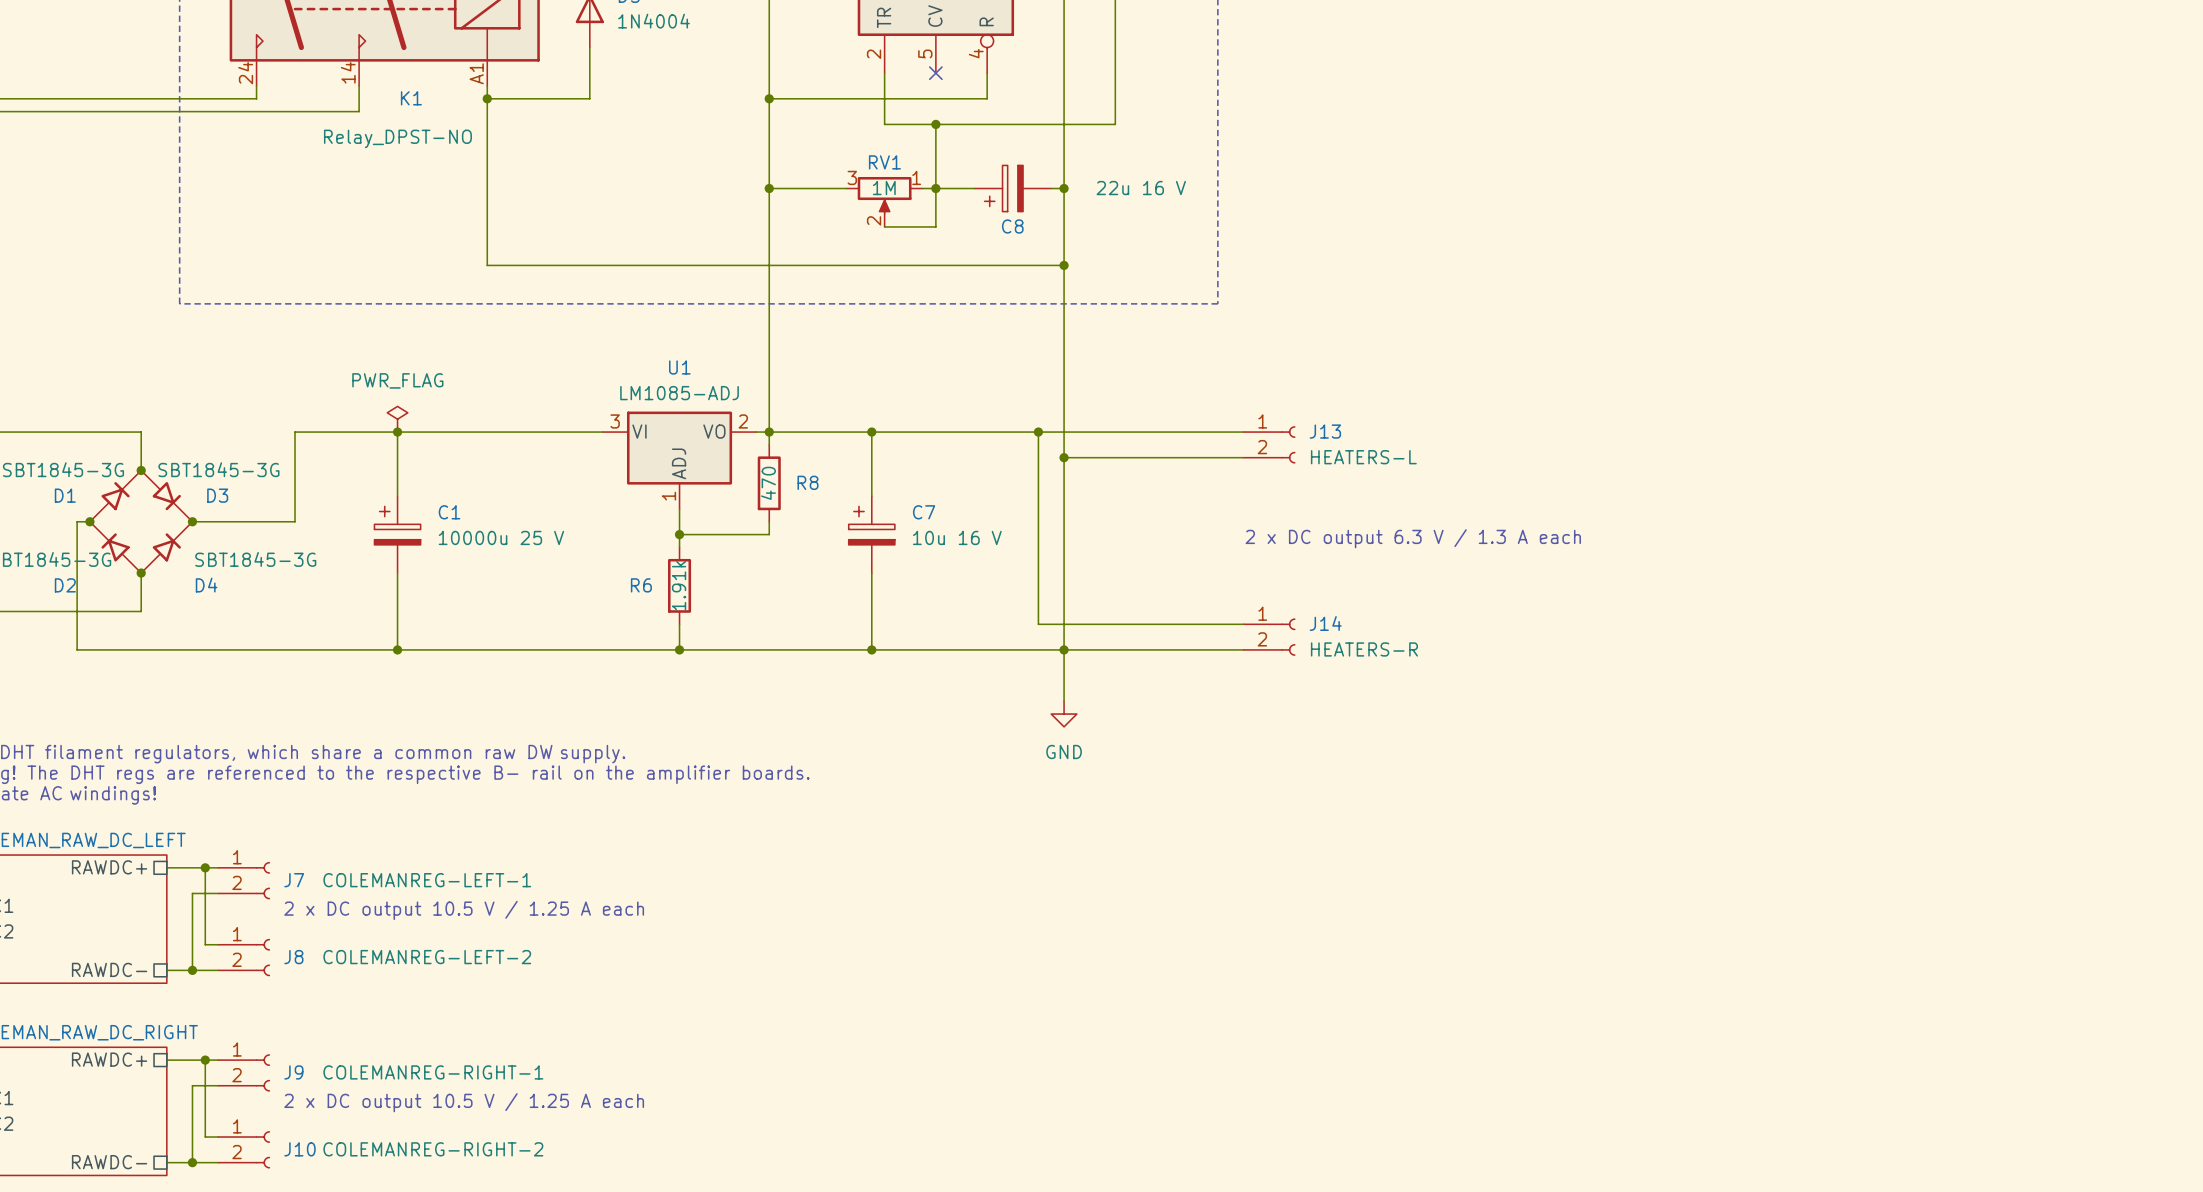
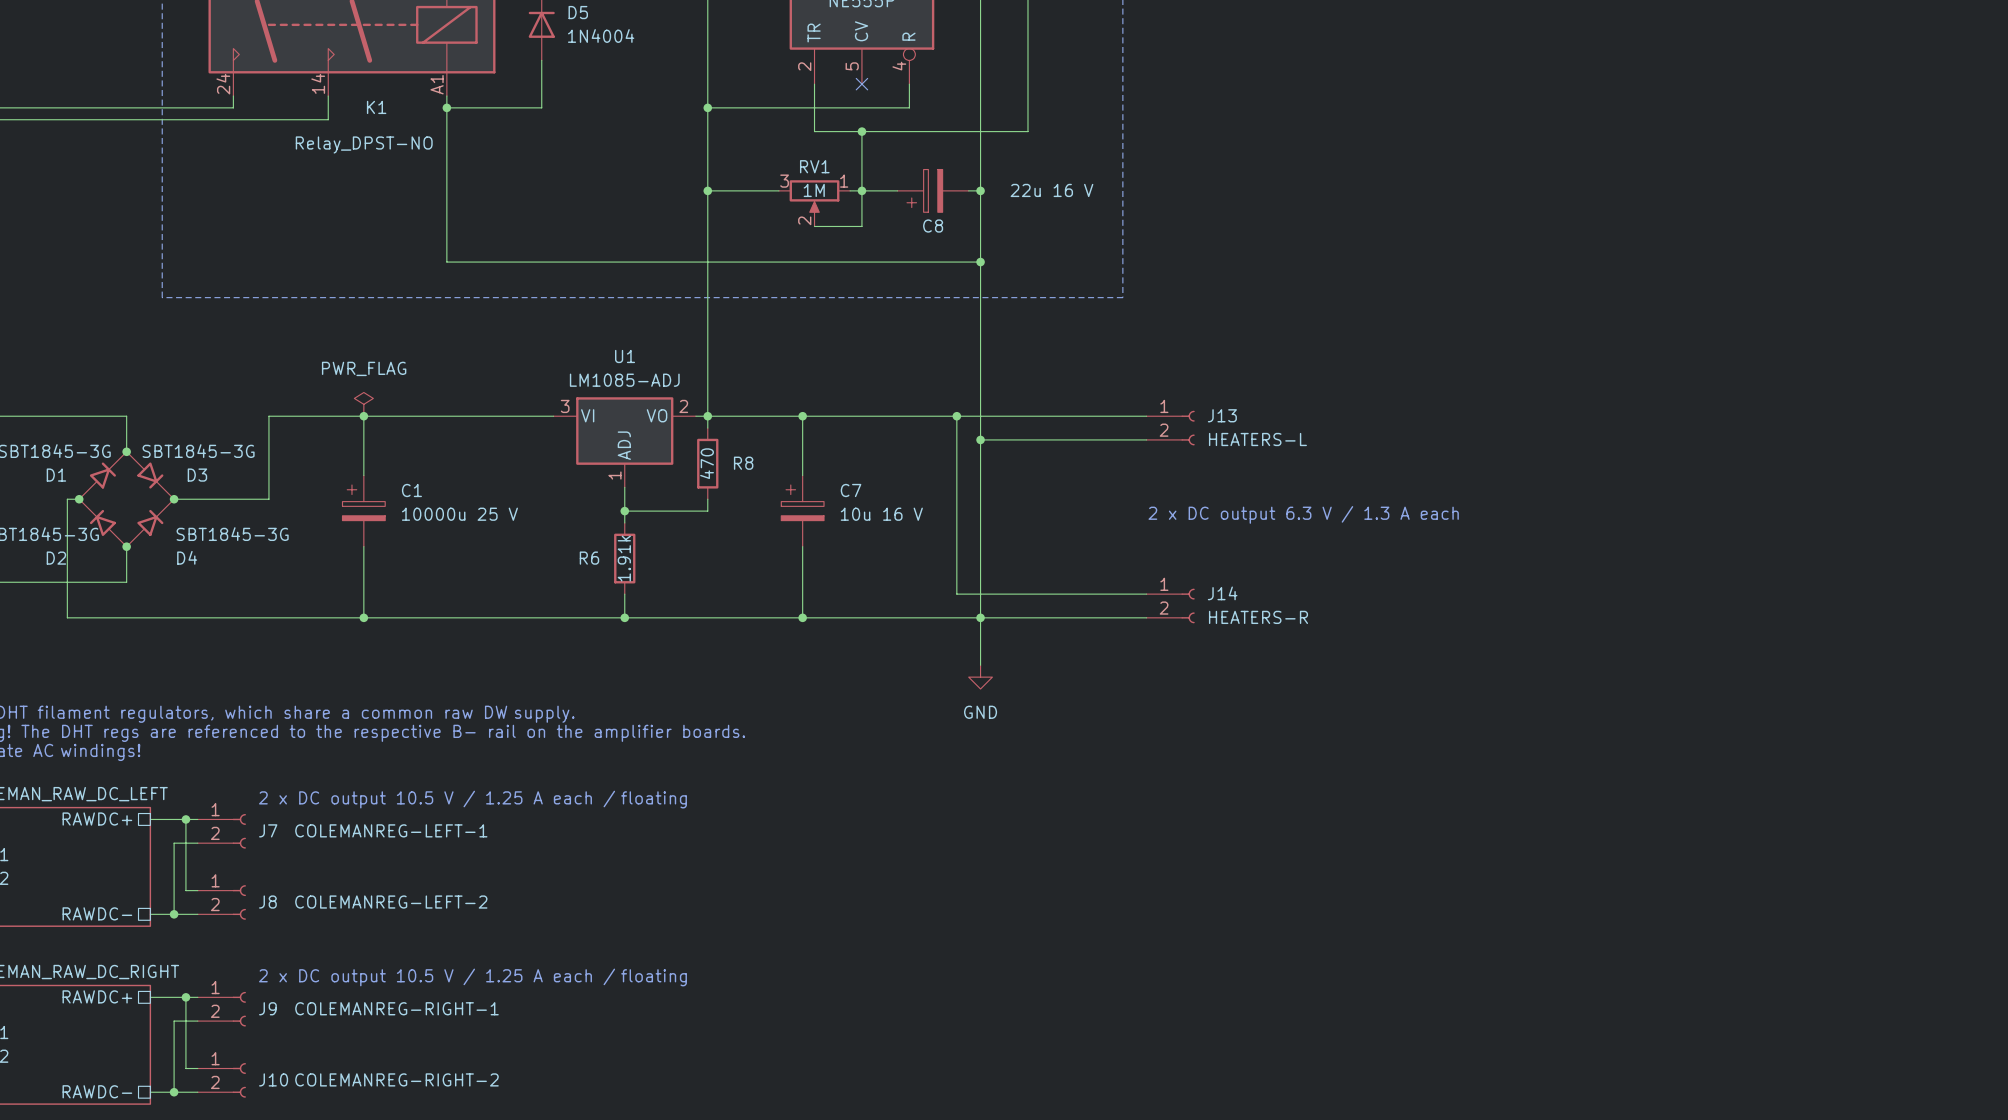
text: none -> 2 x DC output 10.5 V / 1.25 A each / floating (472, 799)
text: 2 x DC output 10.5 V / 1.25 A each (464, 910) -> none
text: none -> 2 x DC output 10.5 V / 1.25 A each / floating (472, 977)
text: 2 x DC output 10.5 V / 1.25 A each (464, 1102) -> none

